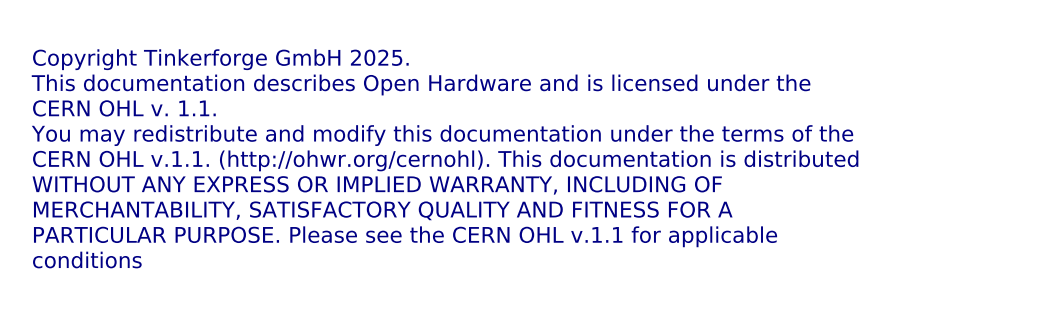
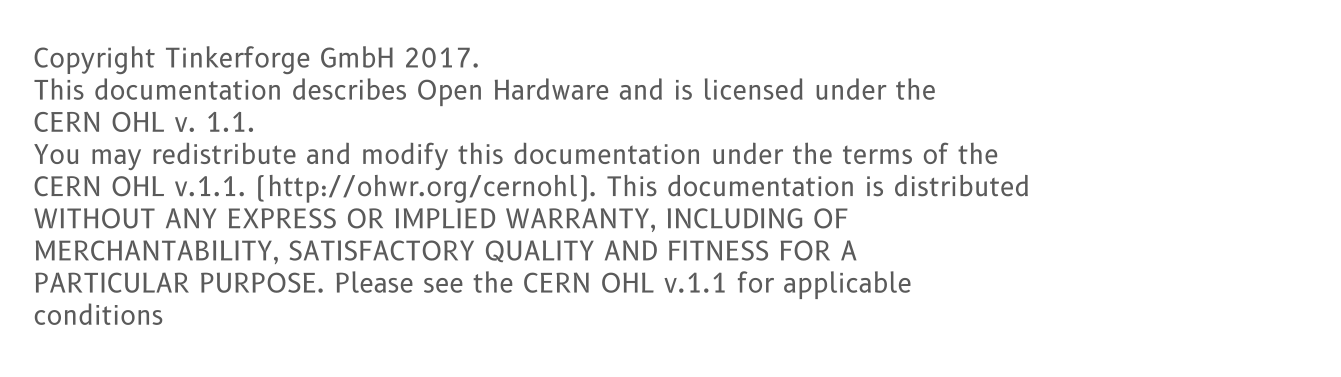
text: Copyright Tinkerforge GmbH 2025. (220, 59) -> Copyright Tinkerforge GmbH 2017. (256, 60)

